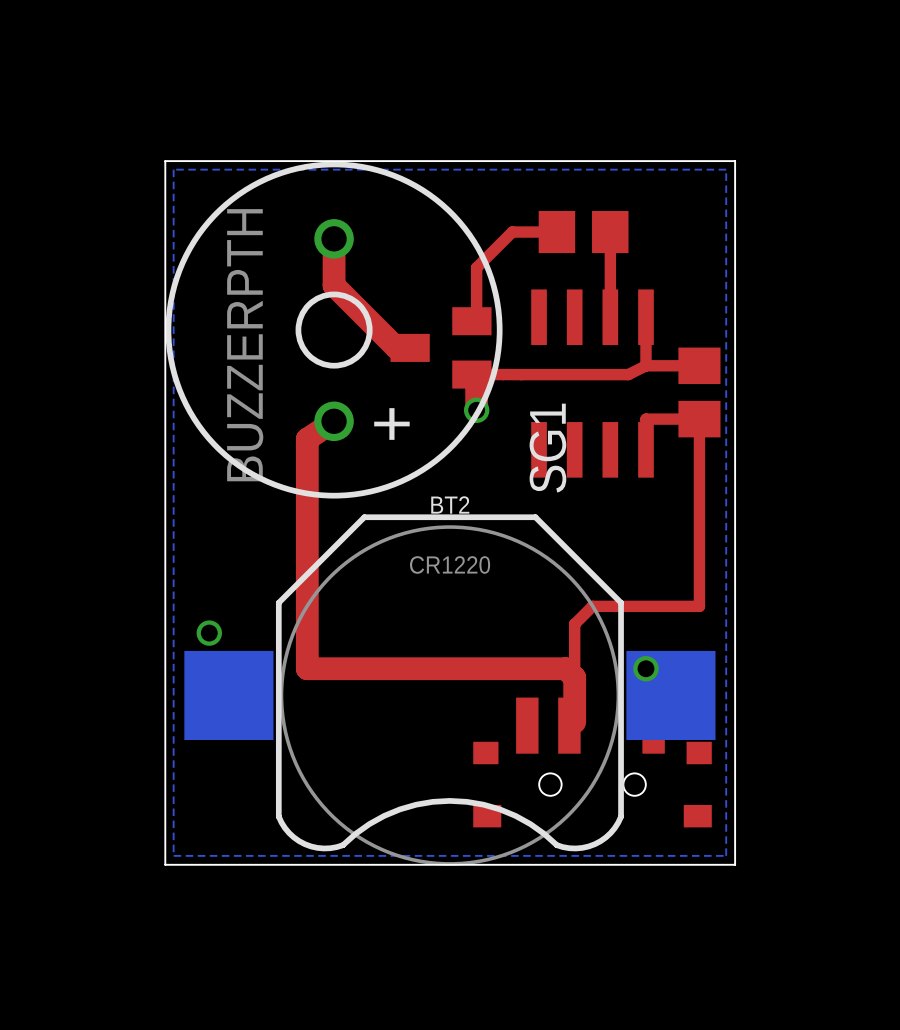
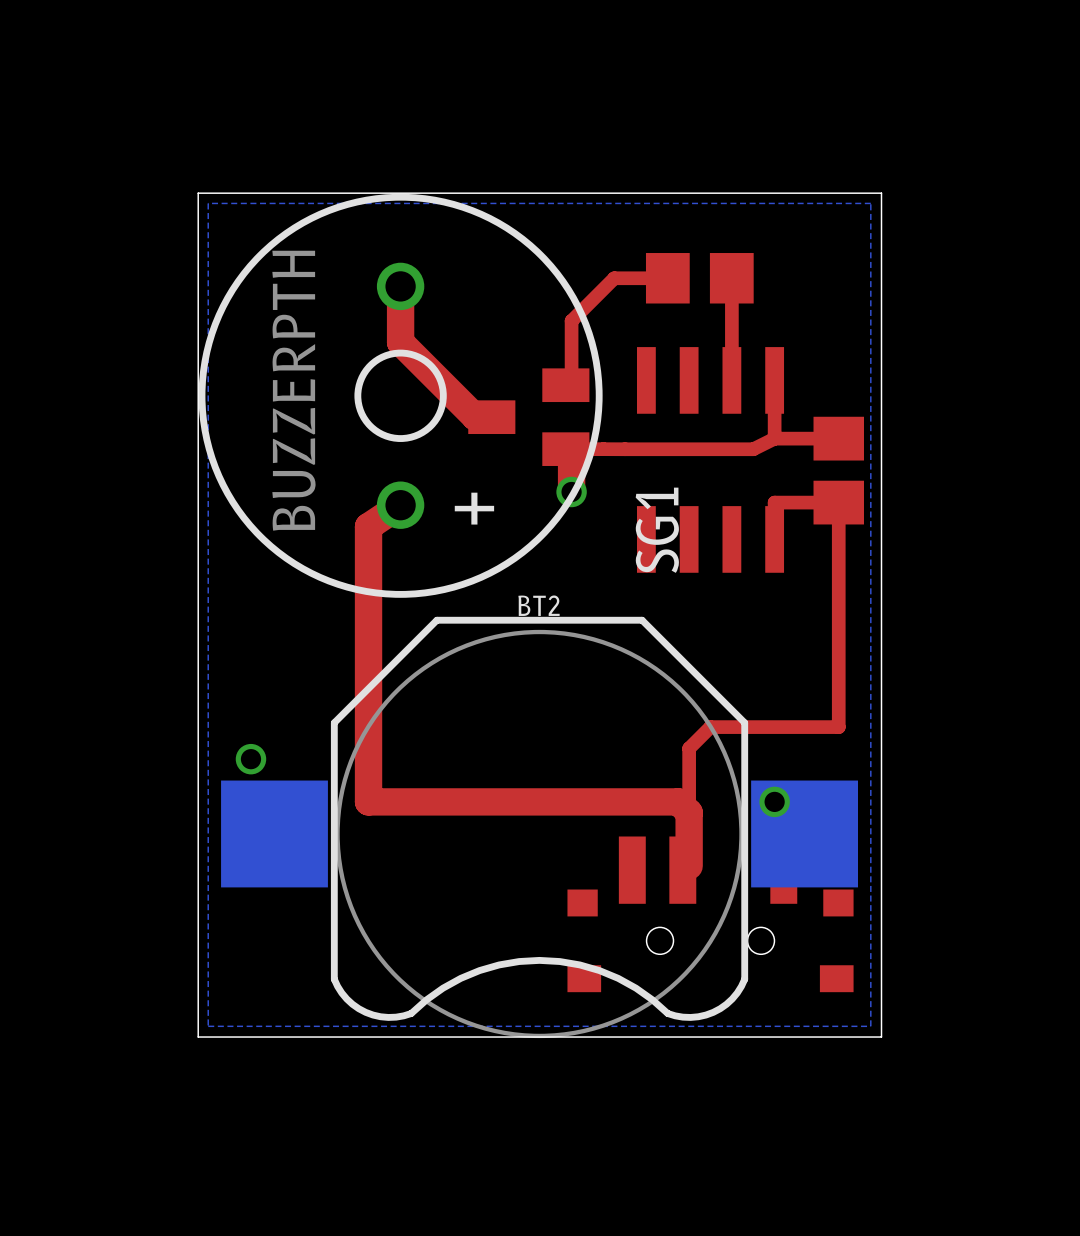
BT2 value: CR1220 (450, 564) -> none

